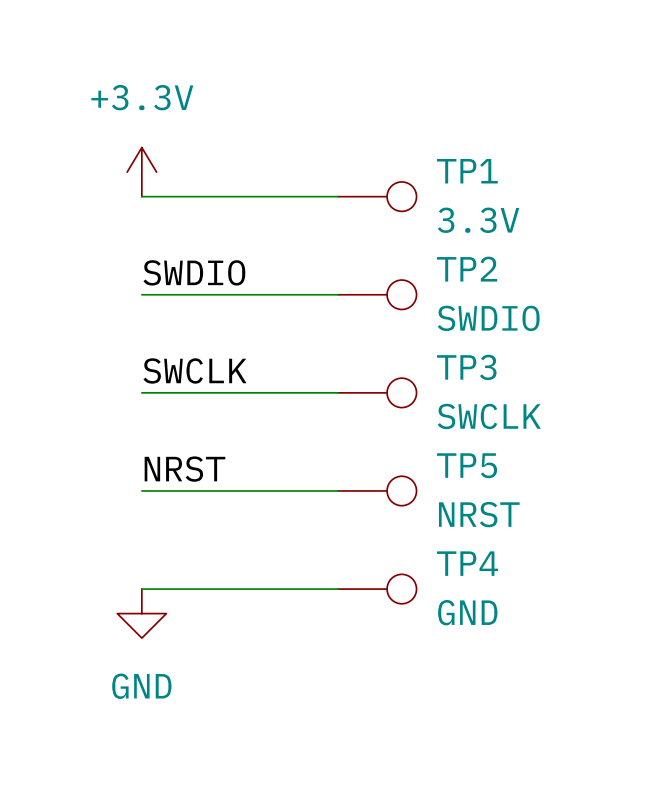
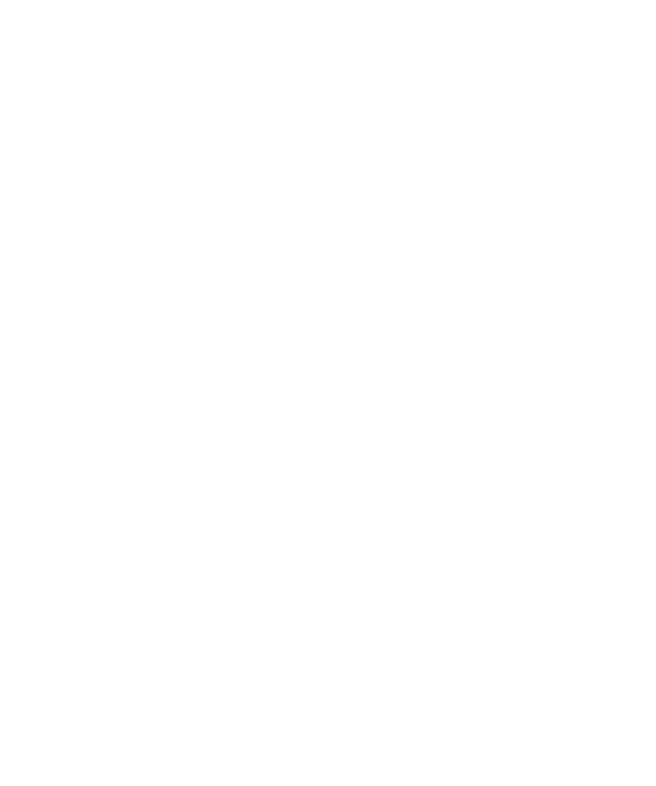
power symbol: +3.3V (141, 172) -> none
wire: (141, 196) (338, 196) -> none
TP1: 3.3V (377, 196) -> none
label: SWDIO (194, 272) -> none
wire: (141, 294) (338, 294) -> none
TP2: SWDIO (377, 294) -> none
label: SWCLK (194, 370) -> none
wire: (141, 392) (338, 392) -> none
TP3: SWCLK (377, 392) -> none
label: NRST (184, 469) -> none
wire: (141, 490) (338, 490) -> none
TP5: NRST (377, 490) -> none
wire: (141, 589) (338, 589) -> none
TP4: GND (377, 589) -> none
power symbol: GND (141, 613) -> none

